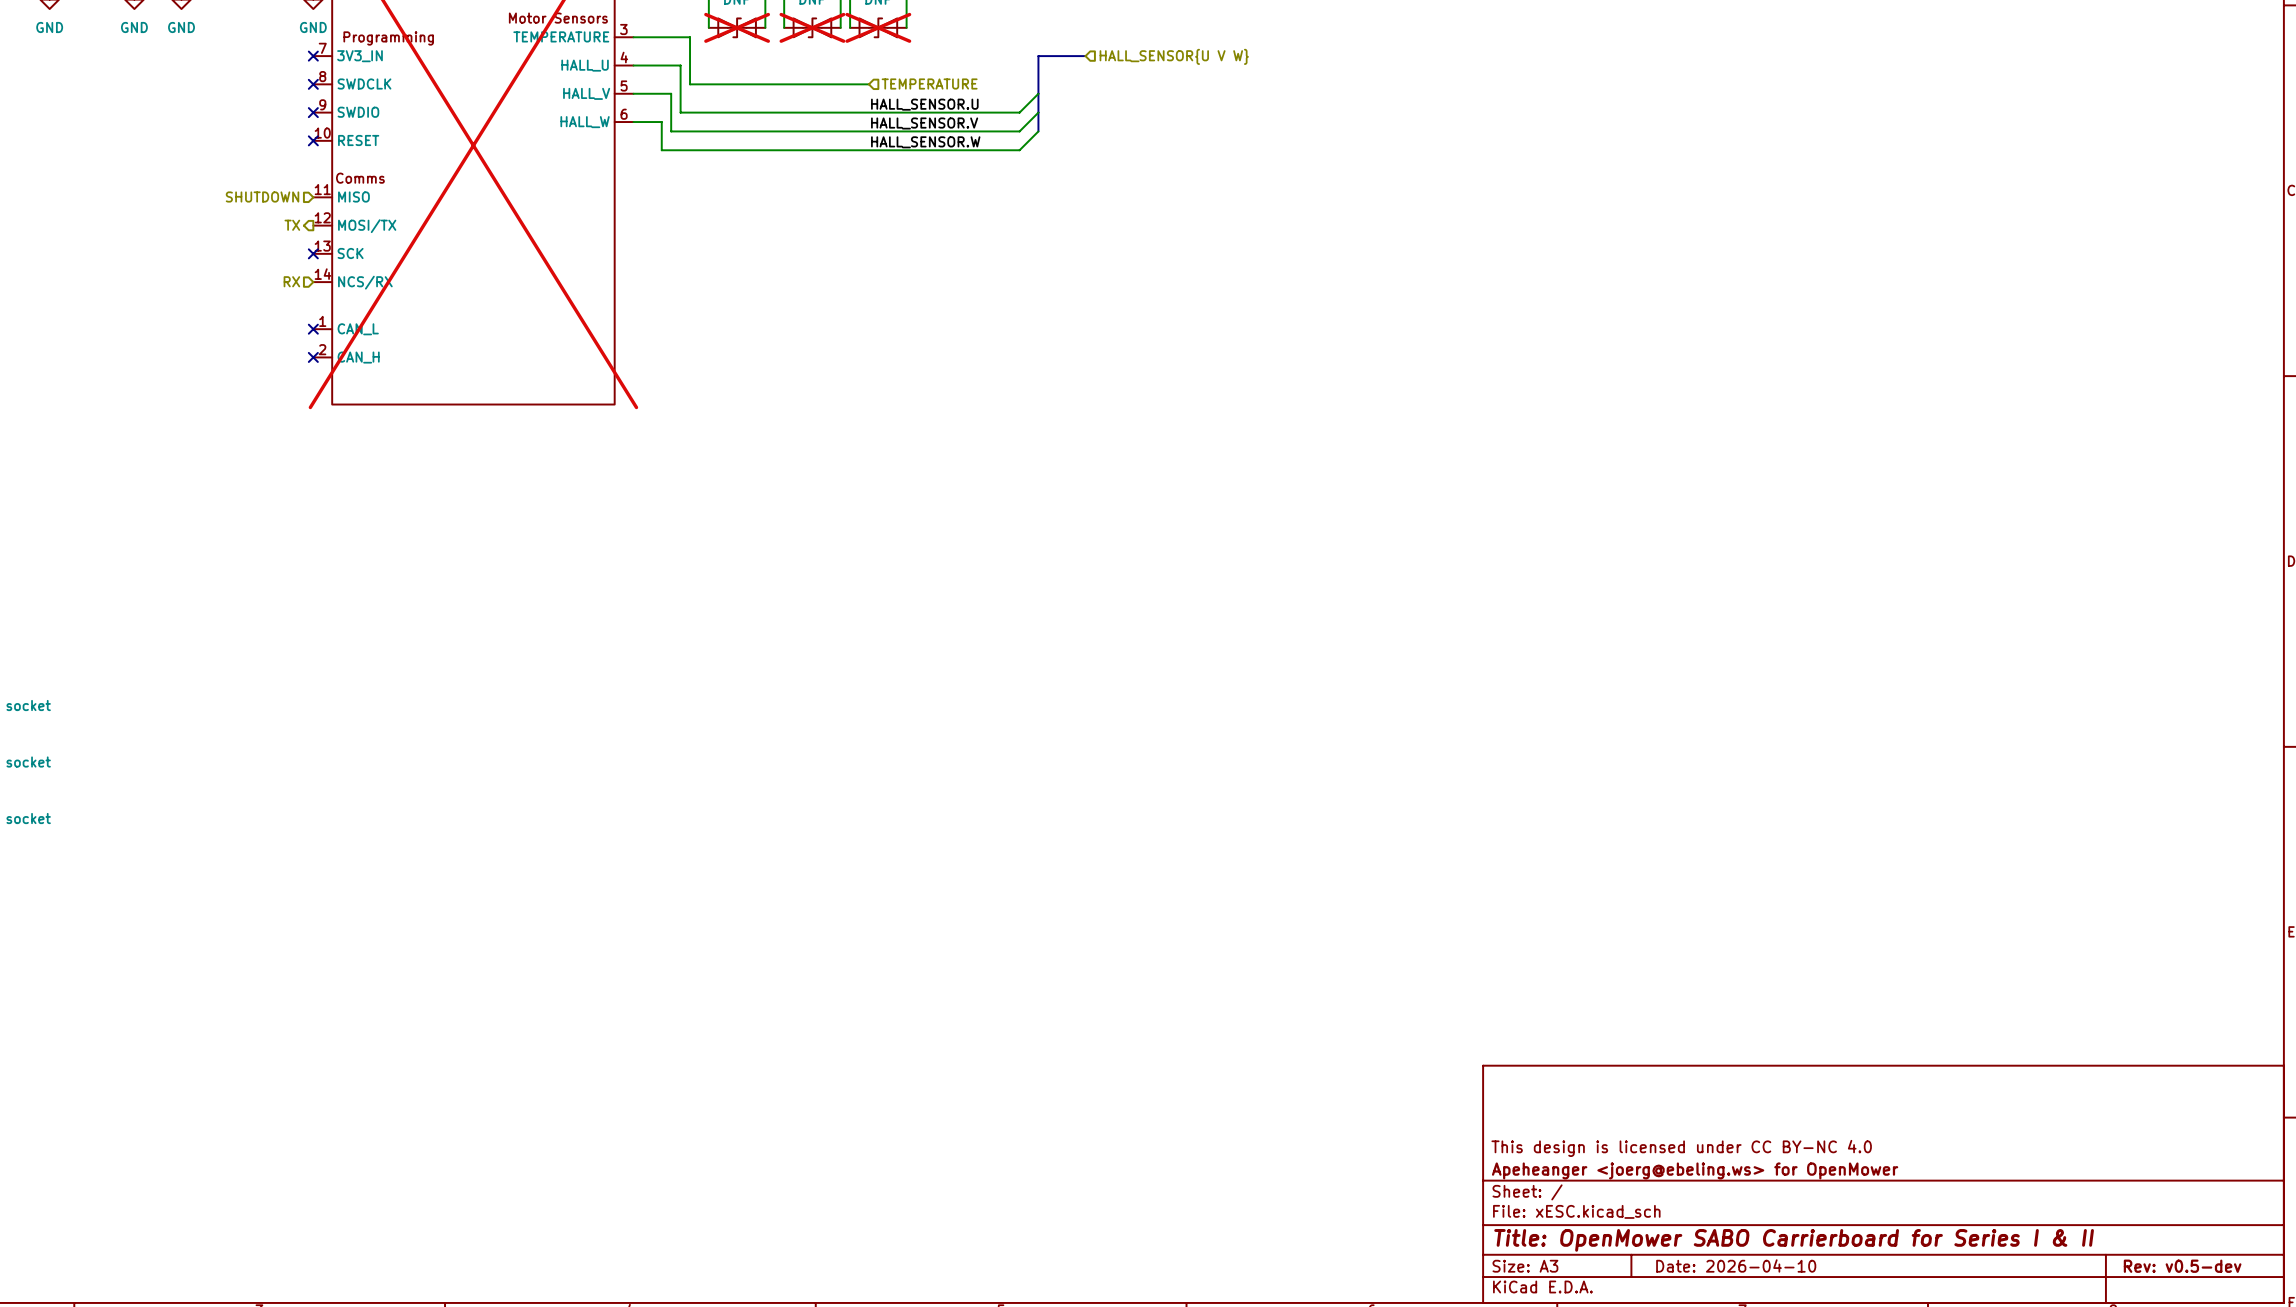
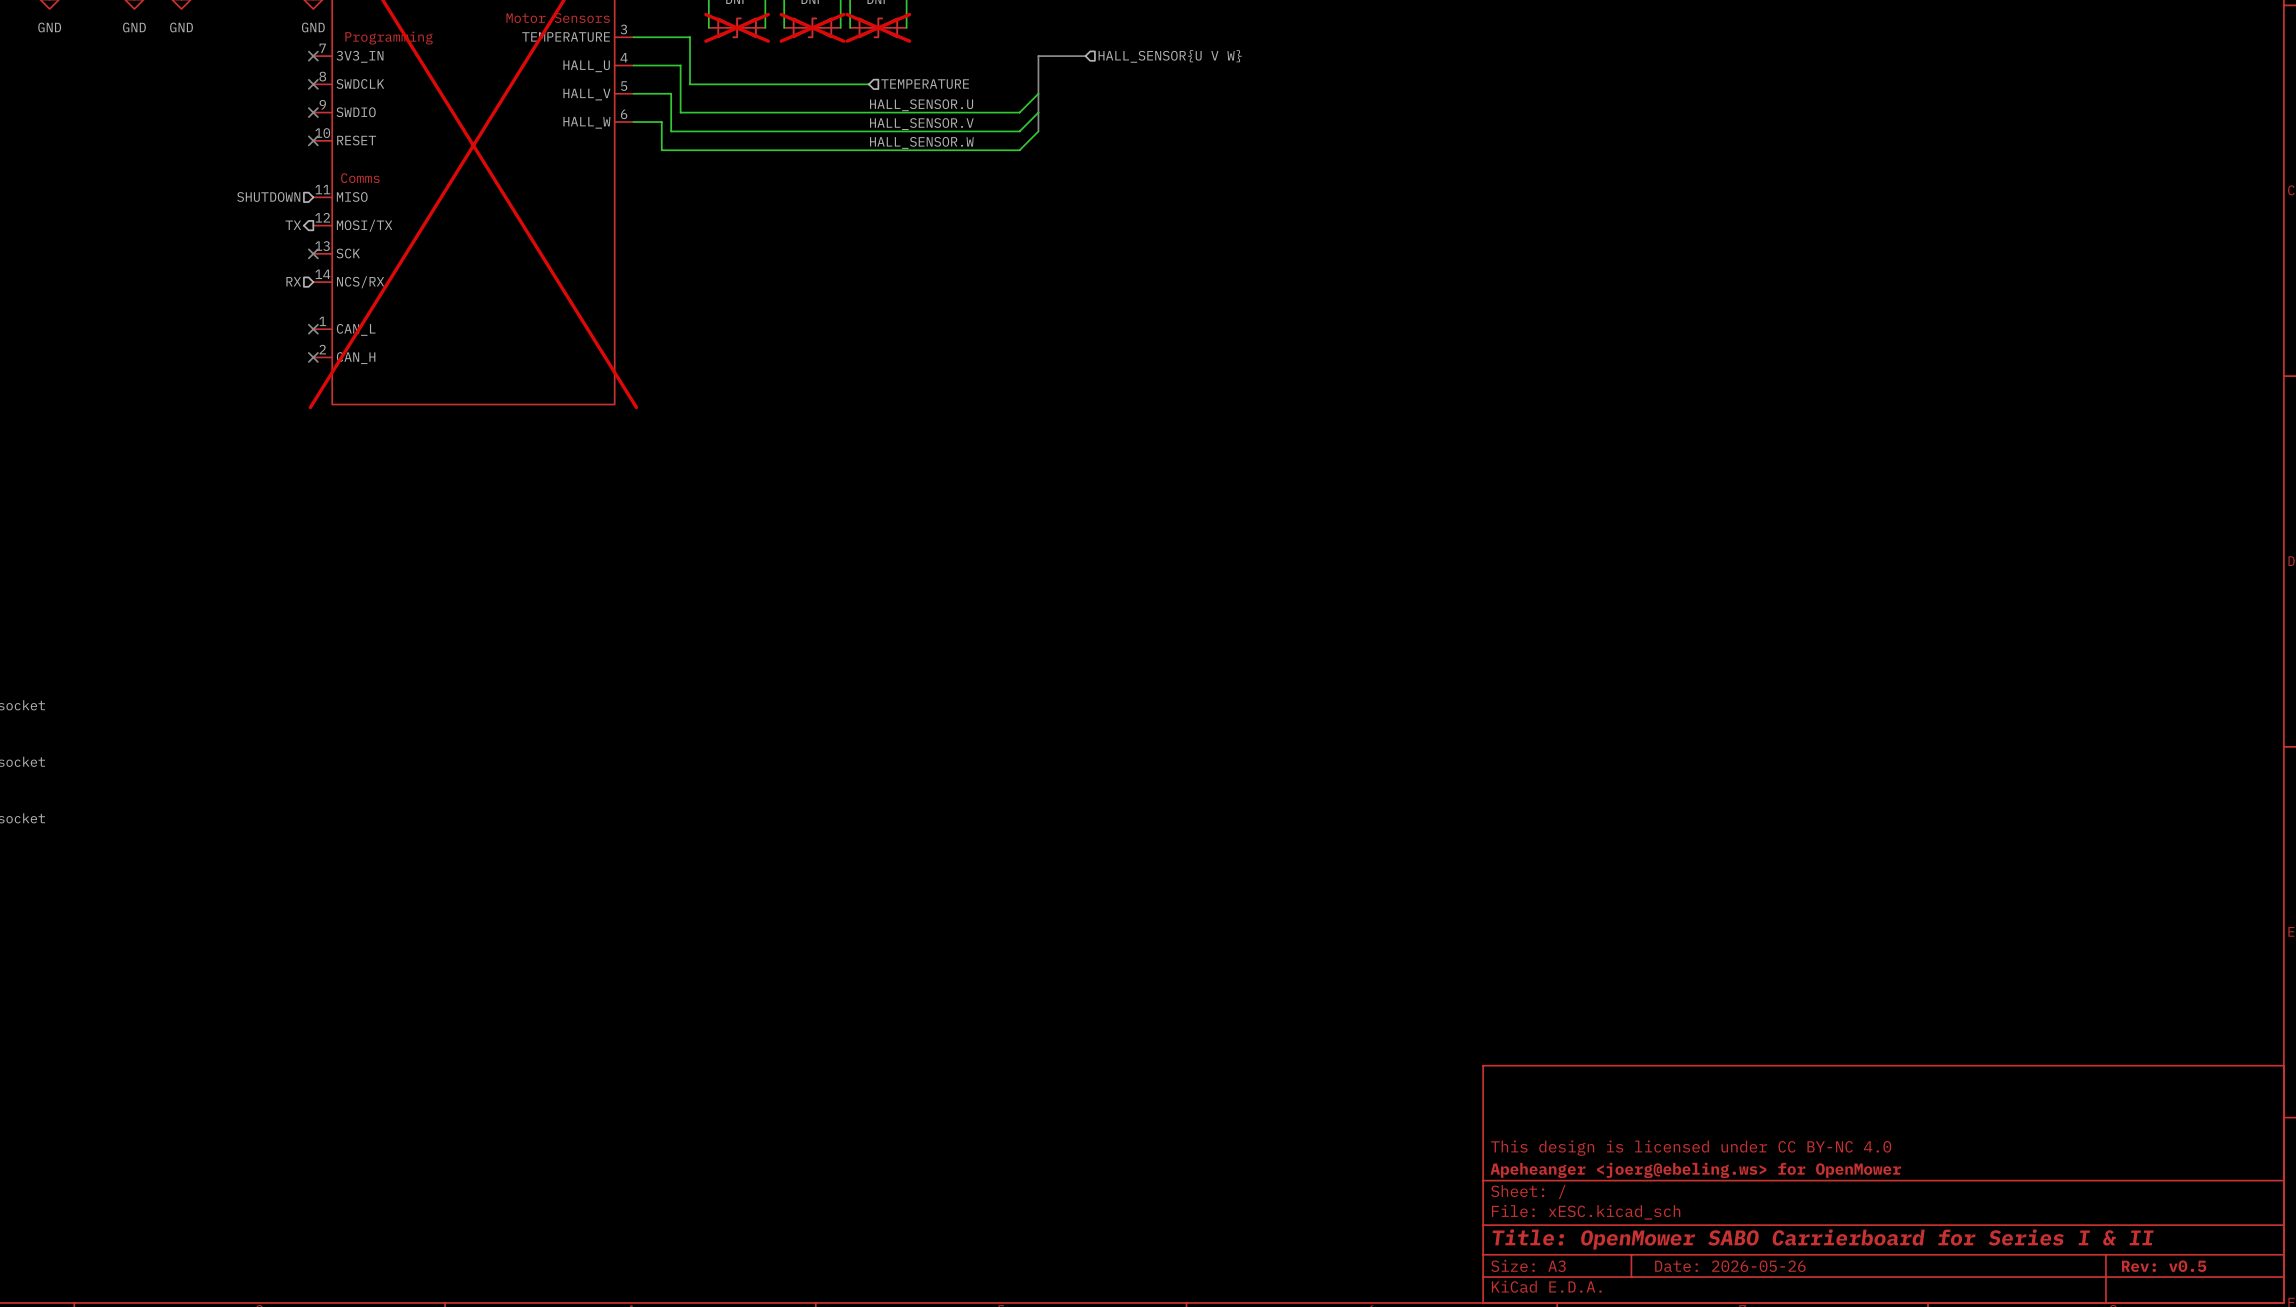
title block: Date: 2026-04-10 (1736, 1265) -> Date: 2026-05-26 (1730, 1266)
title block: Rev: v0.5-dev (2182, 1266) -> Rev: v0.5 (2164, 1266)

